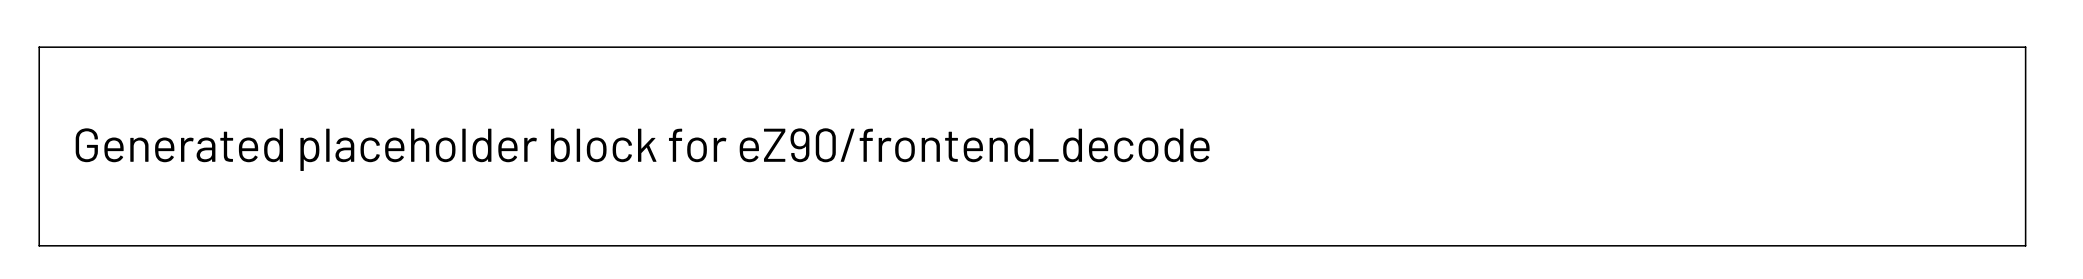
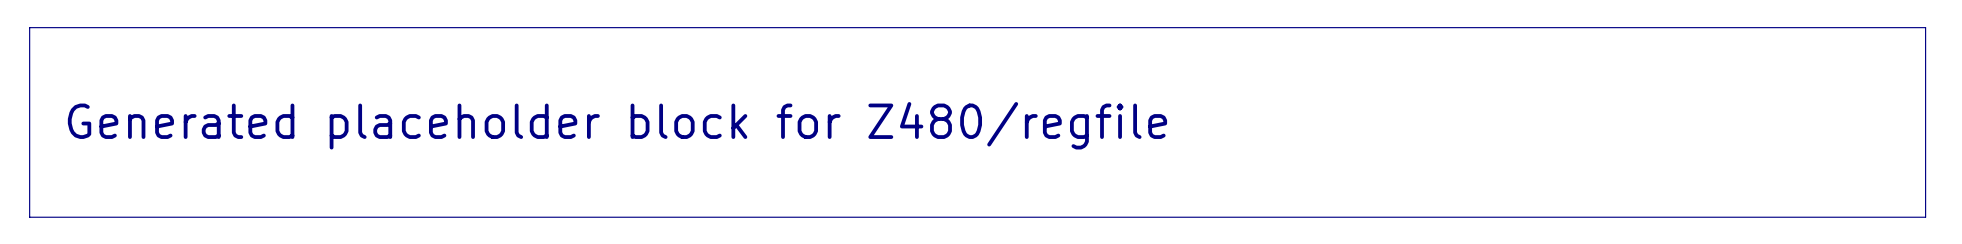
text: Generated placeholder block for eZ90/frontend_decode (642, 149) -> Generated placeholder block for Z480/regfile (617, 125)

